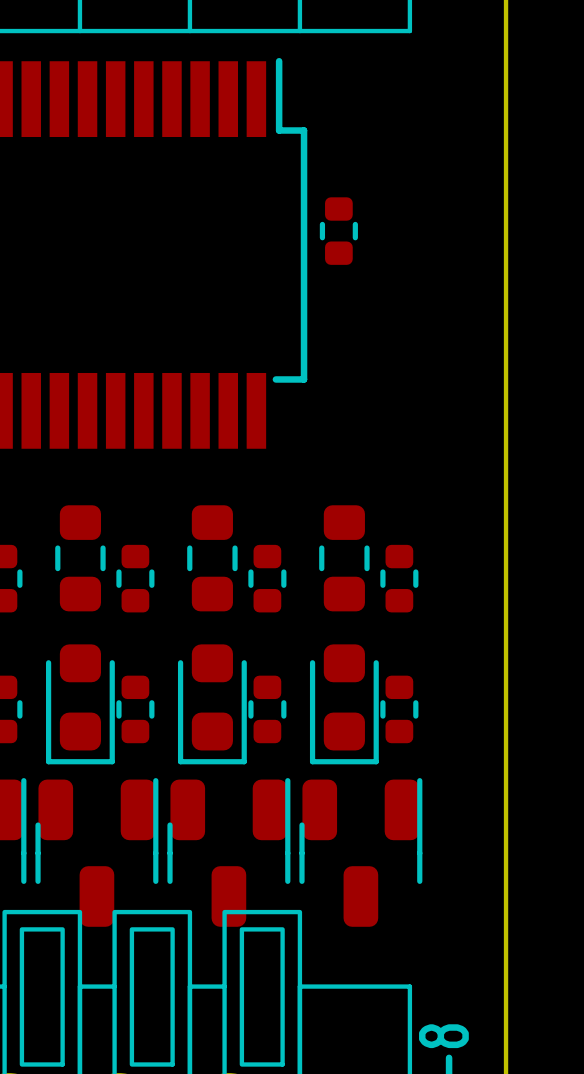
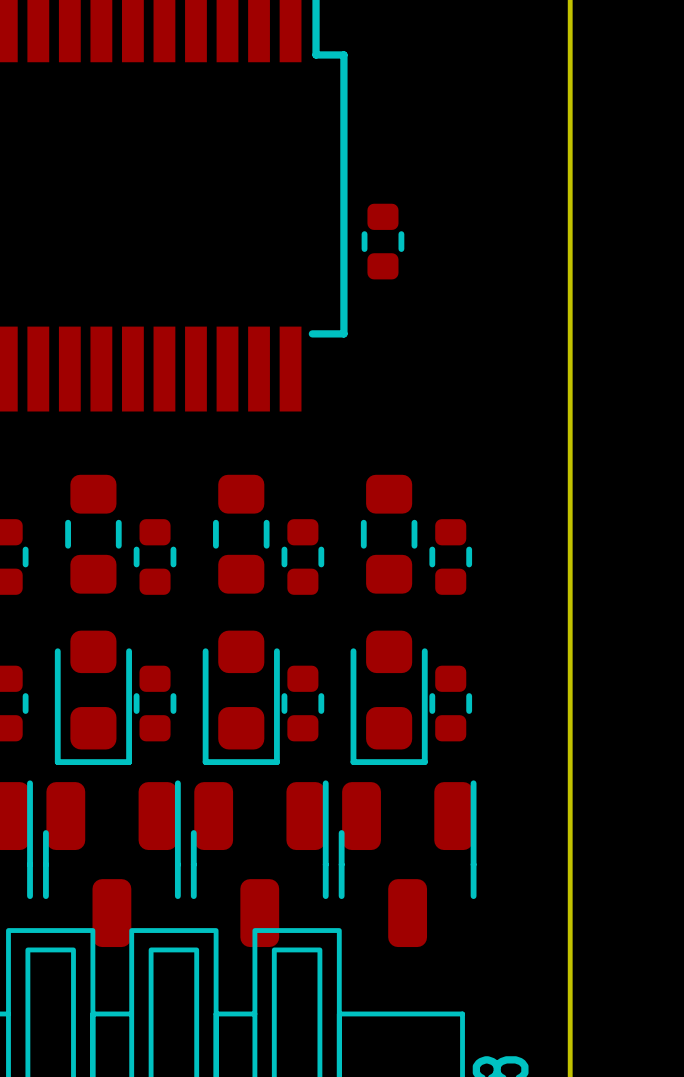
part position: (338, 231) -> (382, 241)

